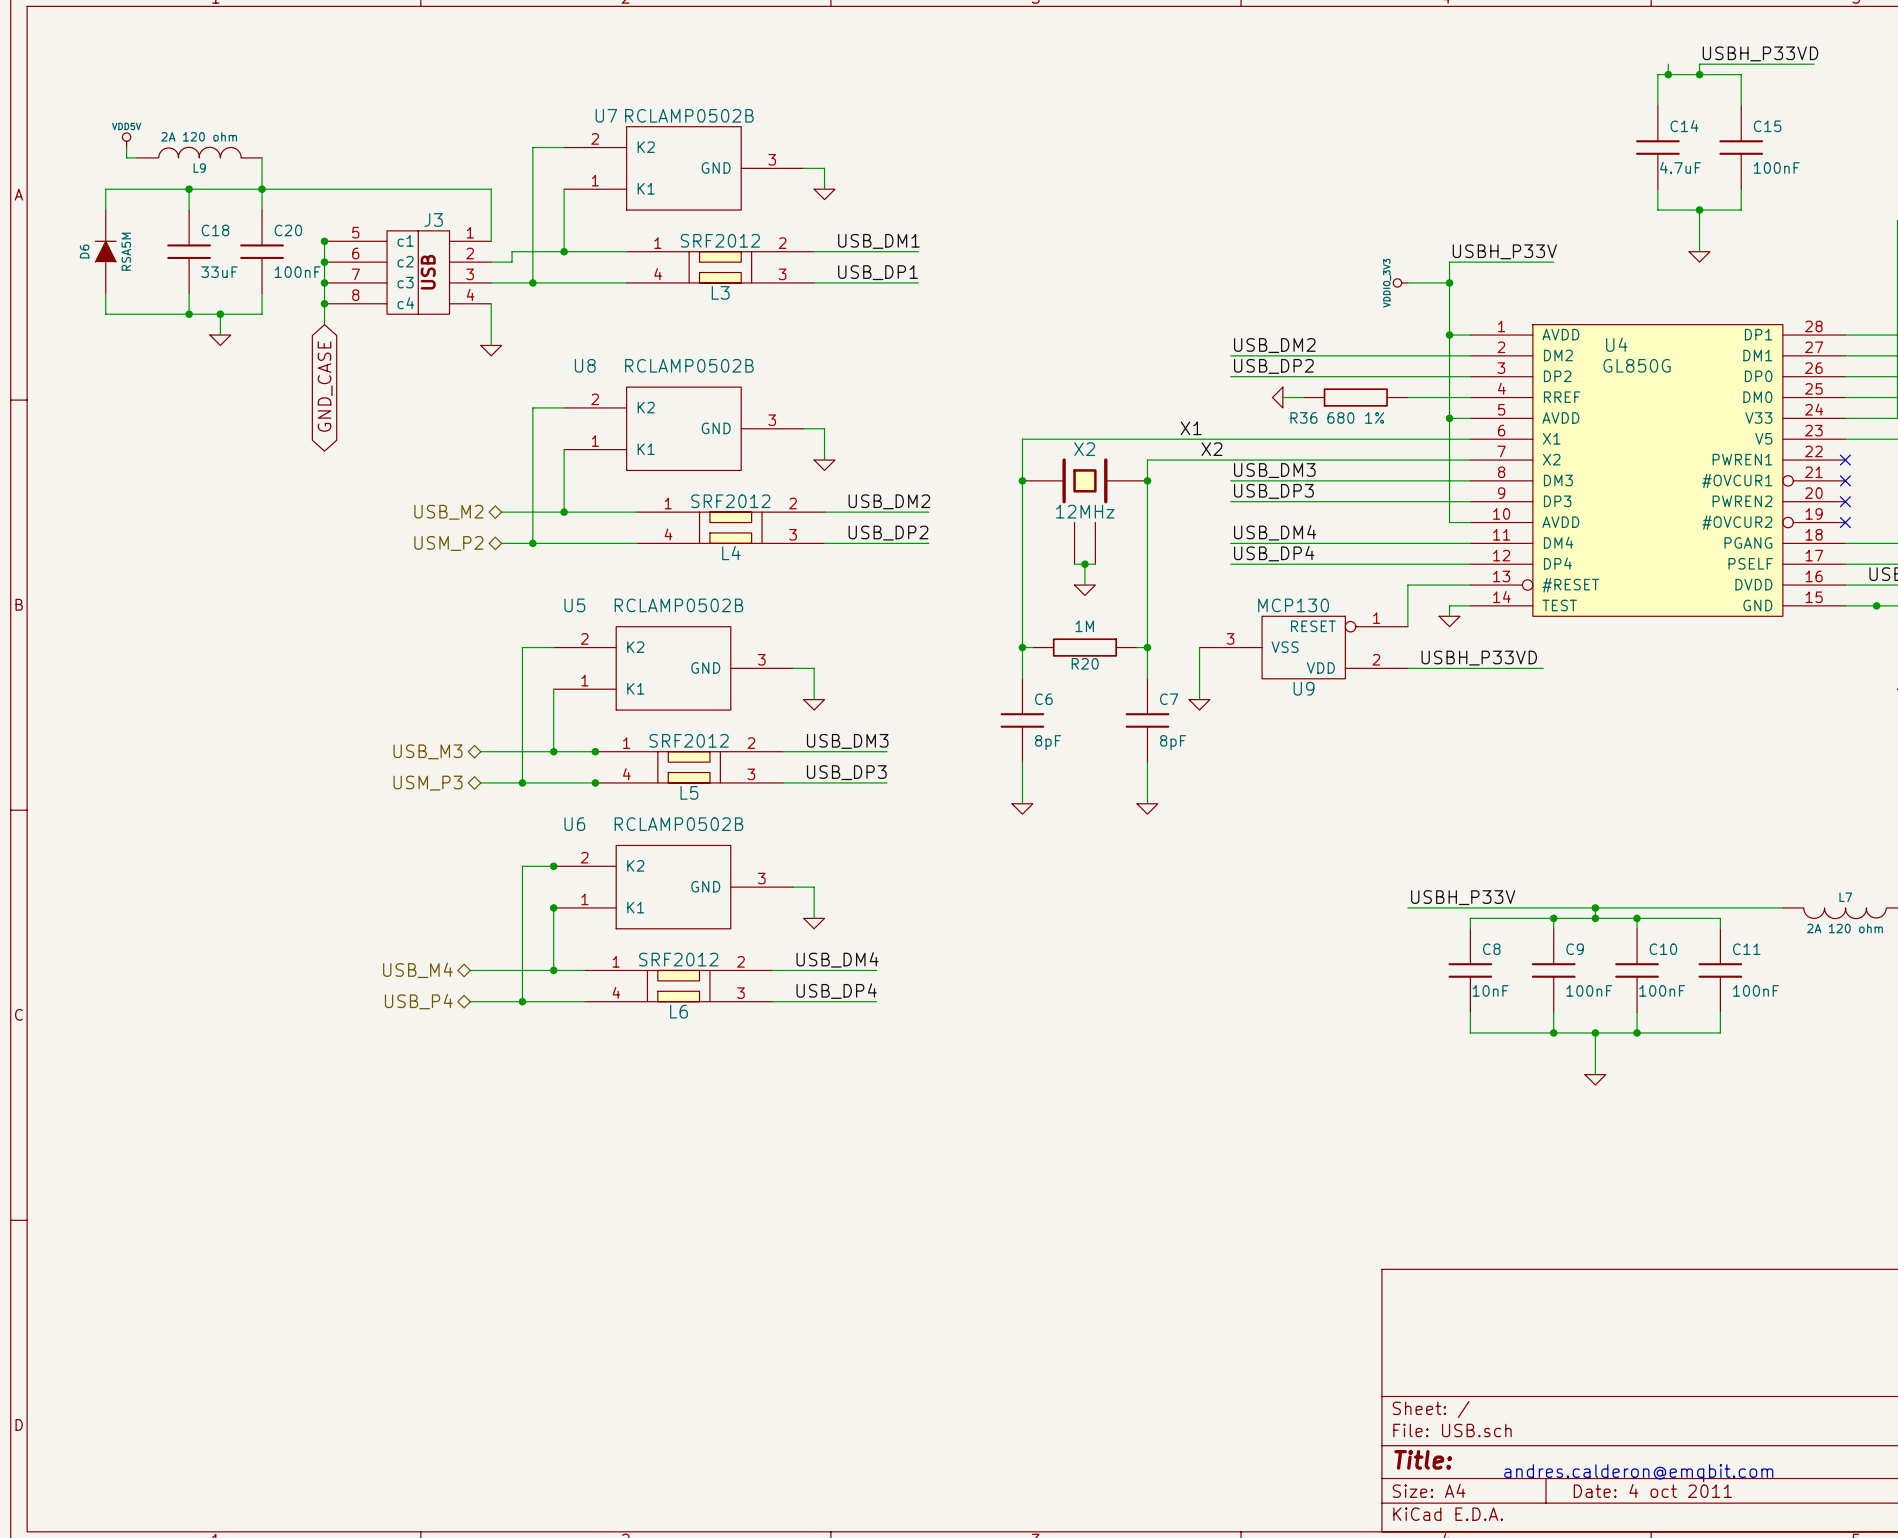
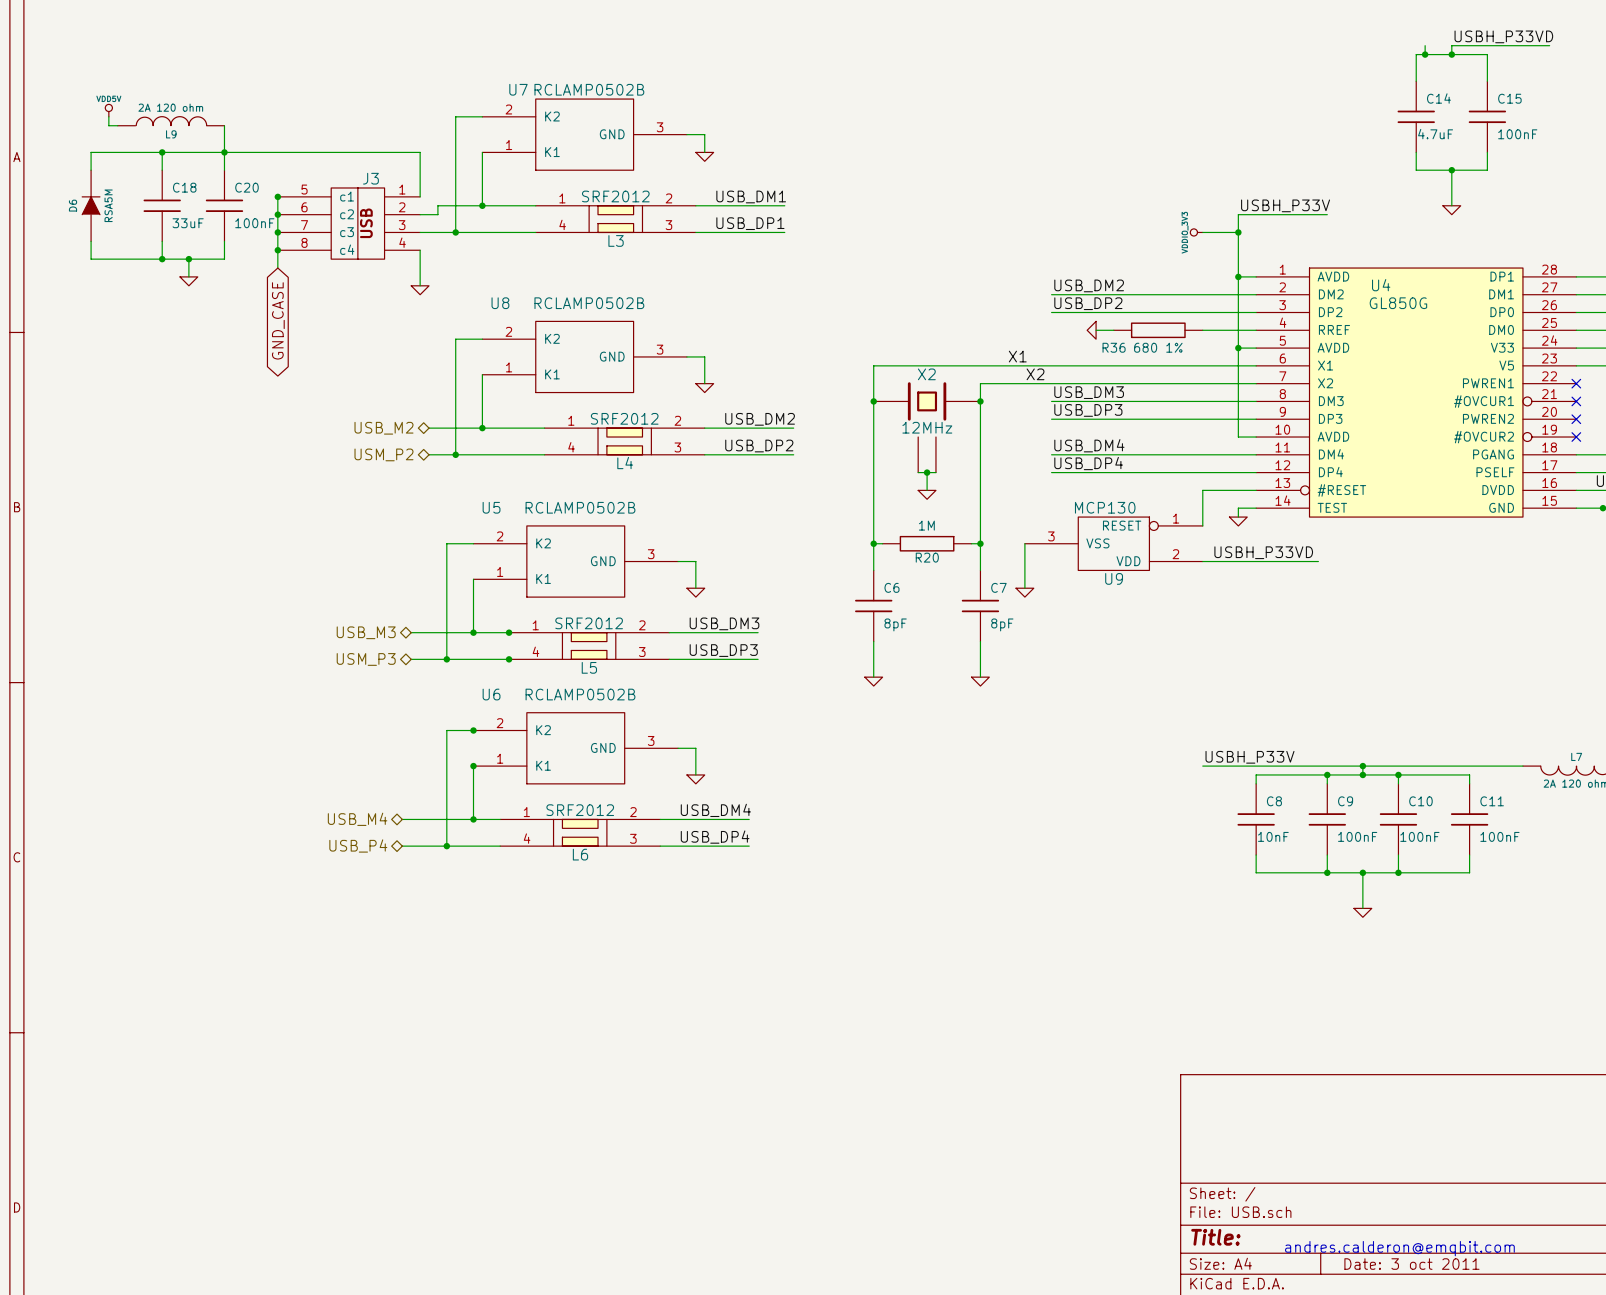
title block: Date: 4 oct 2011 (1652, 1490) -> Date: 3 oct 2011 (1411, 1264)

